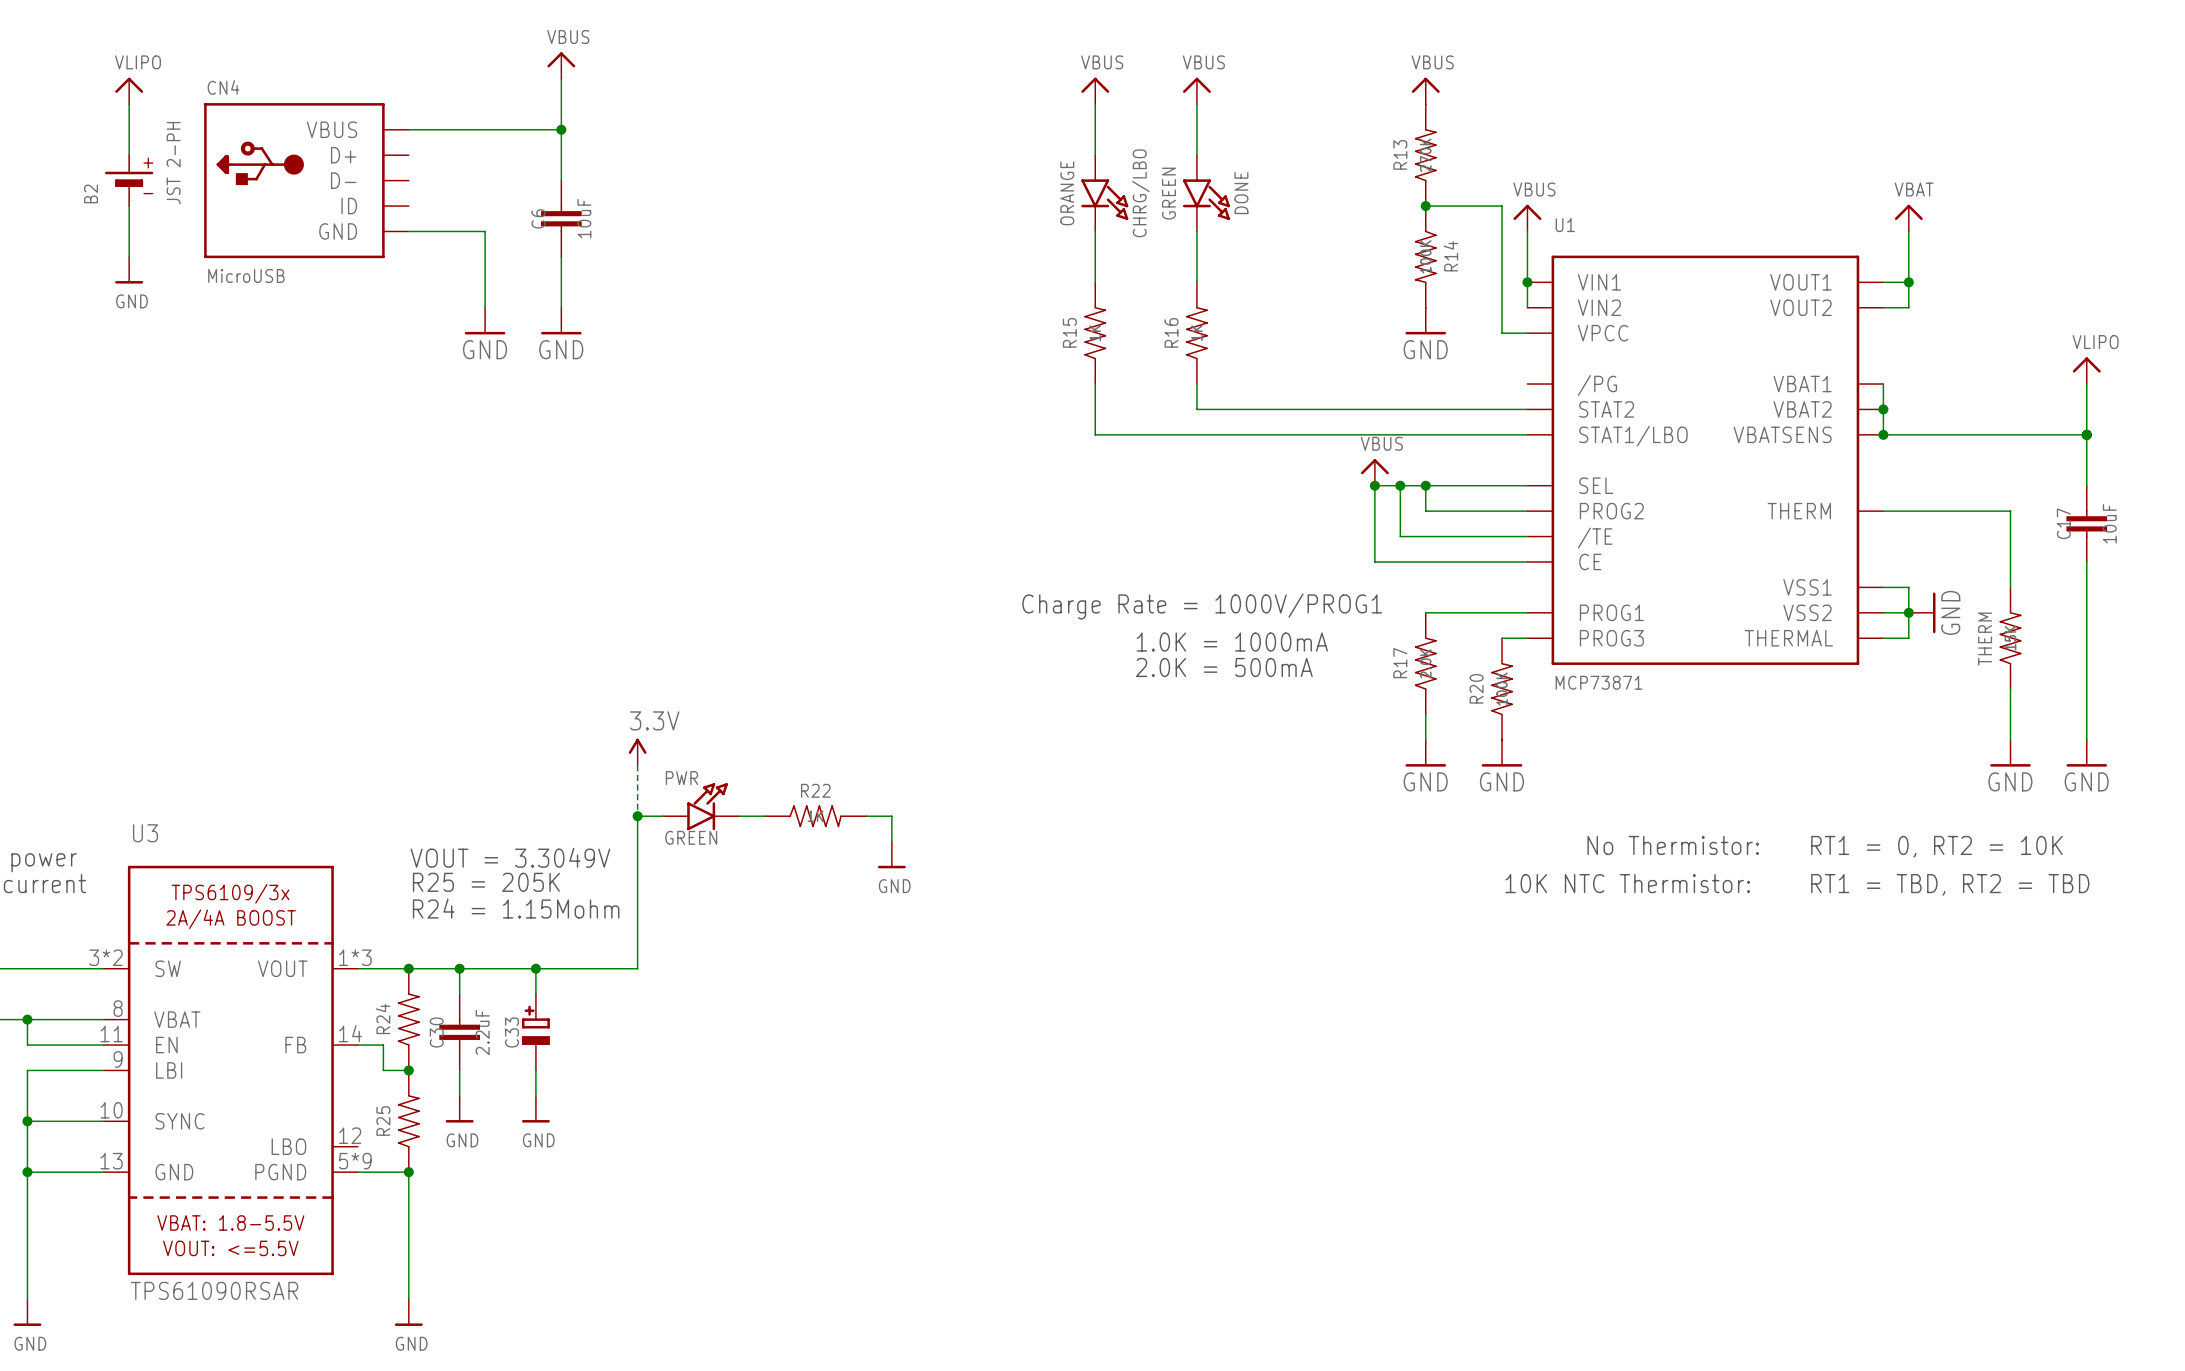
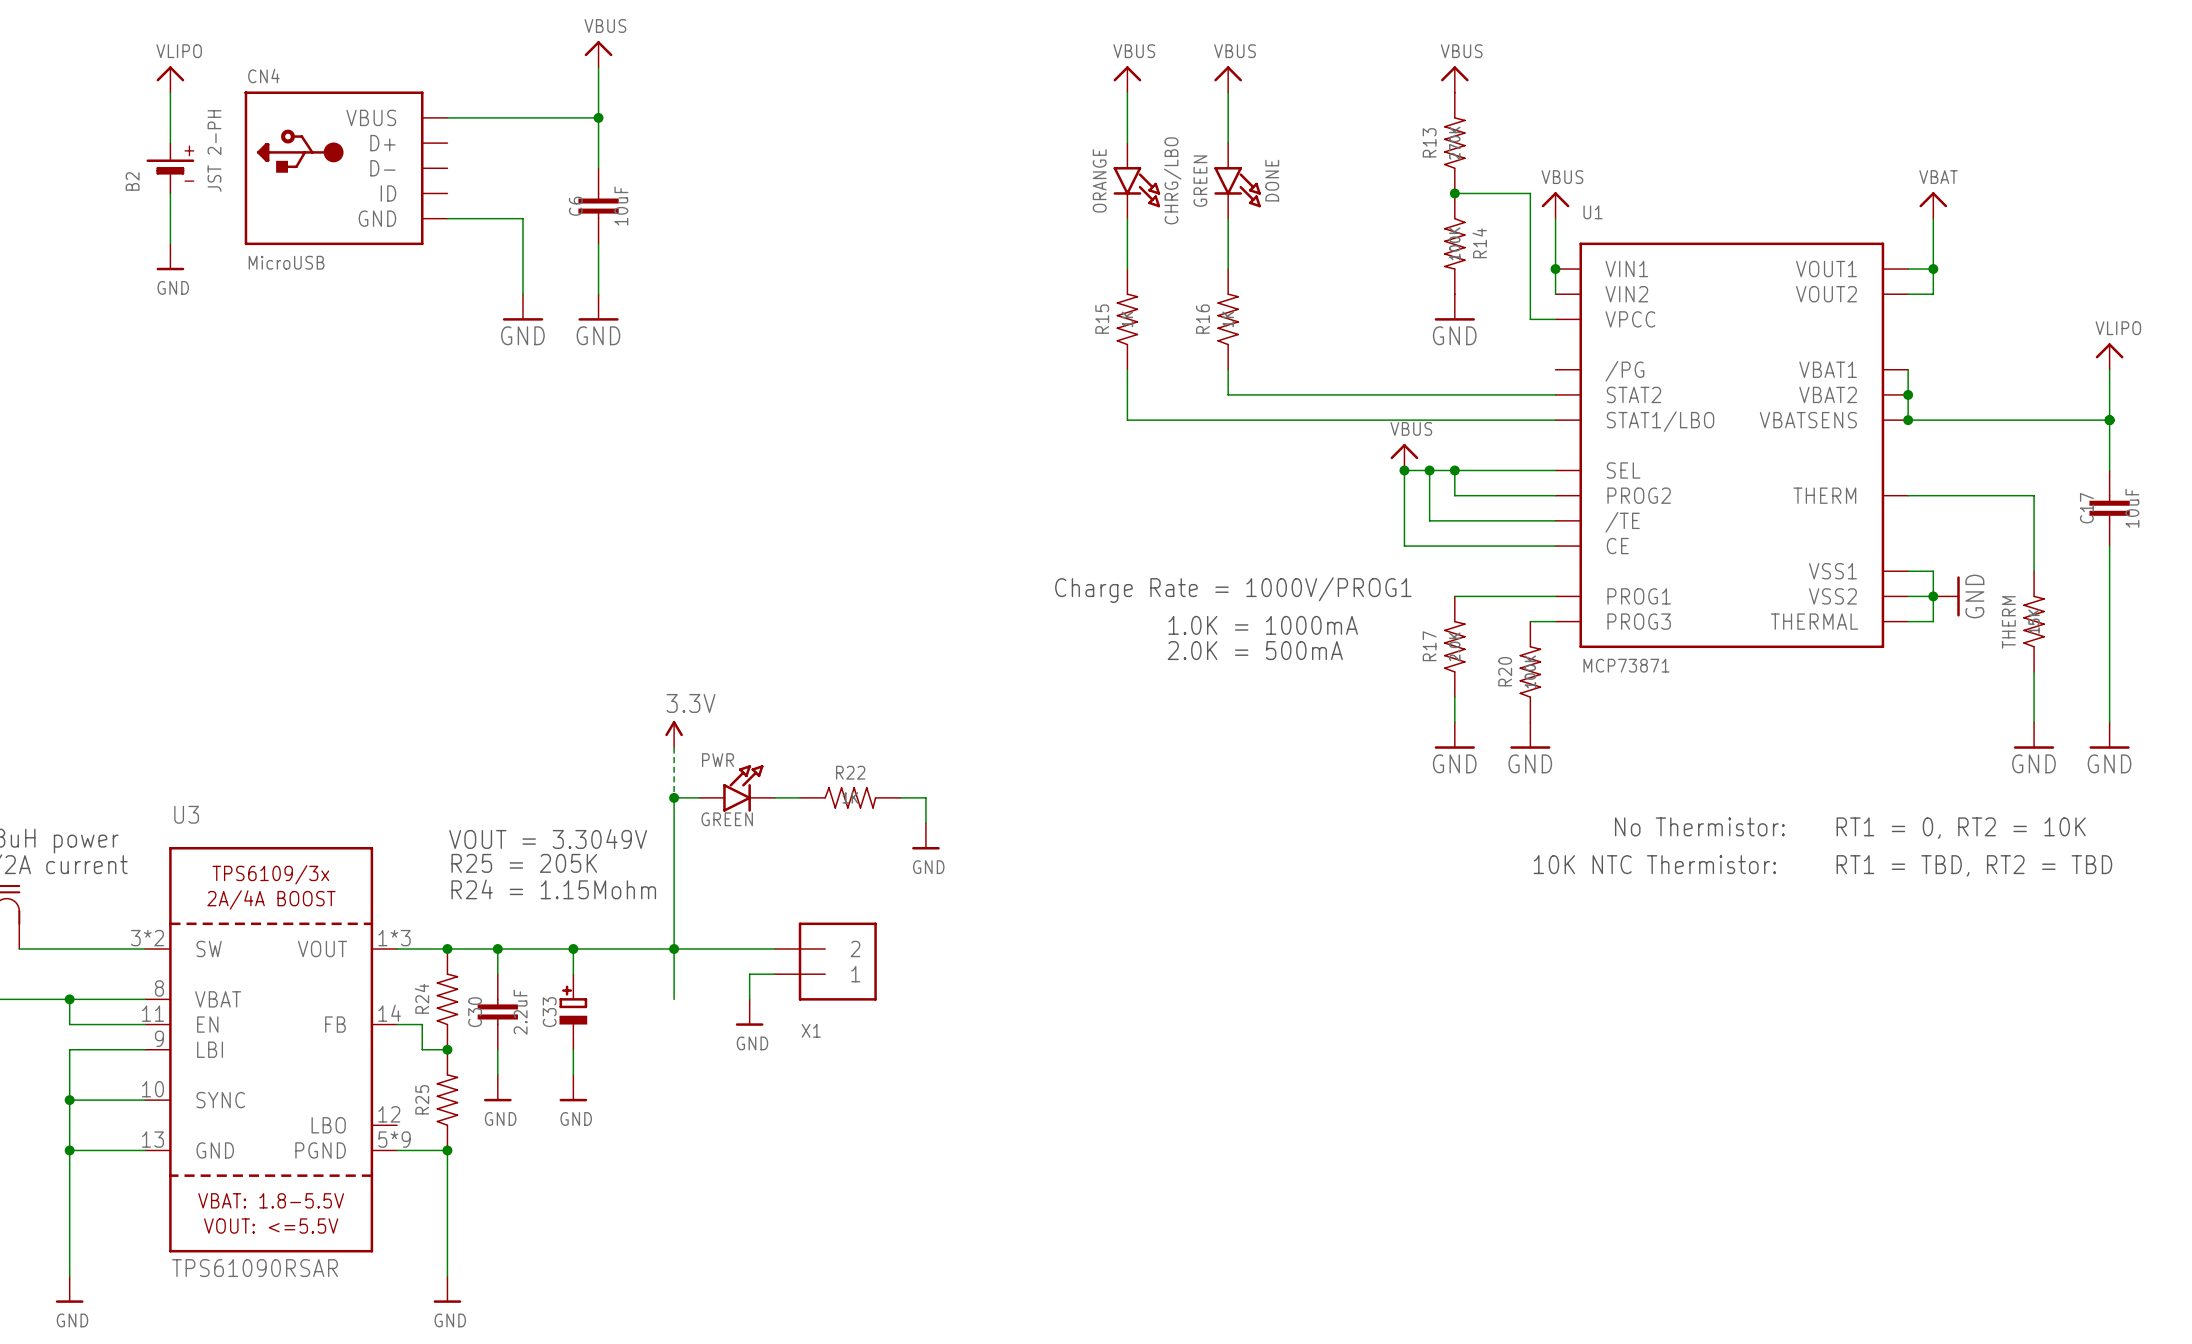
junction: none -> (674, 948)
wire: none -> (774, 948) (674, 948) (674, 999)
X1: none -> (825, 961)
wire: none -> (774, 974) (749, 974) (749, 999)
power symbol: none -> GND (749, 1012)

